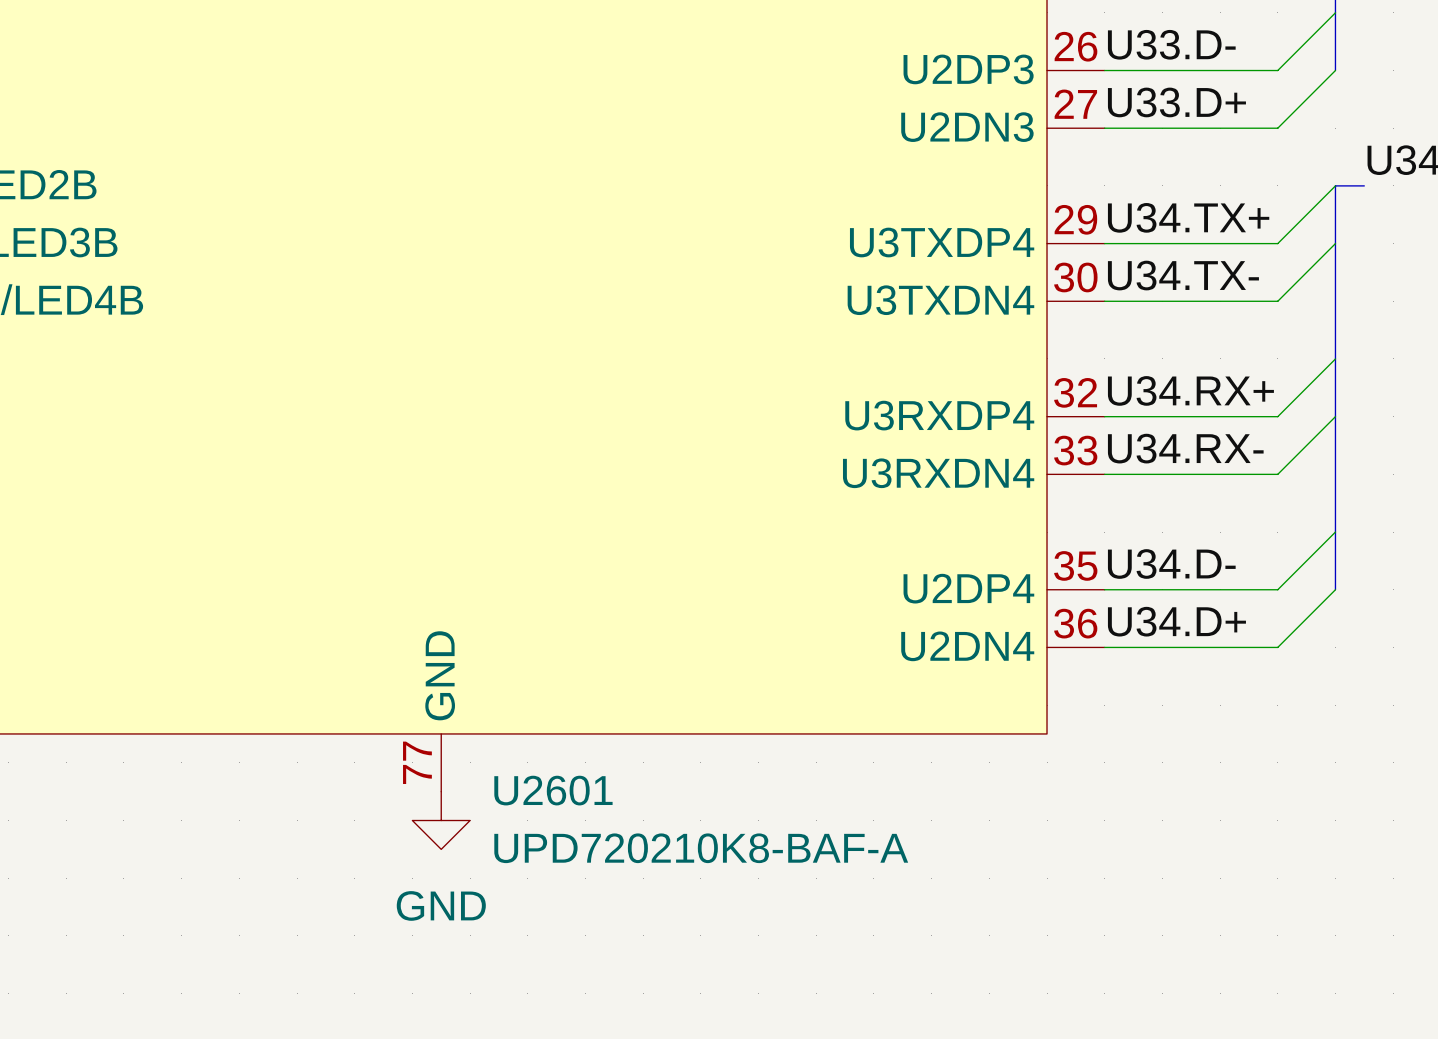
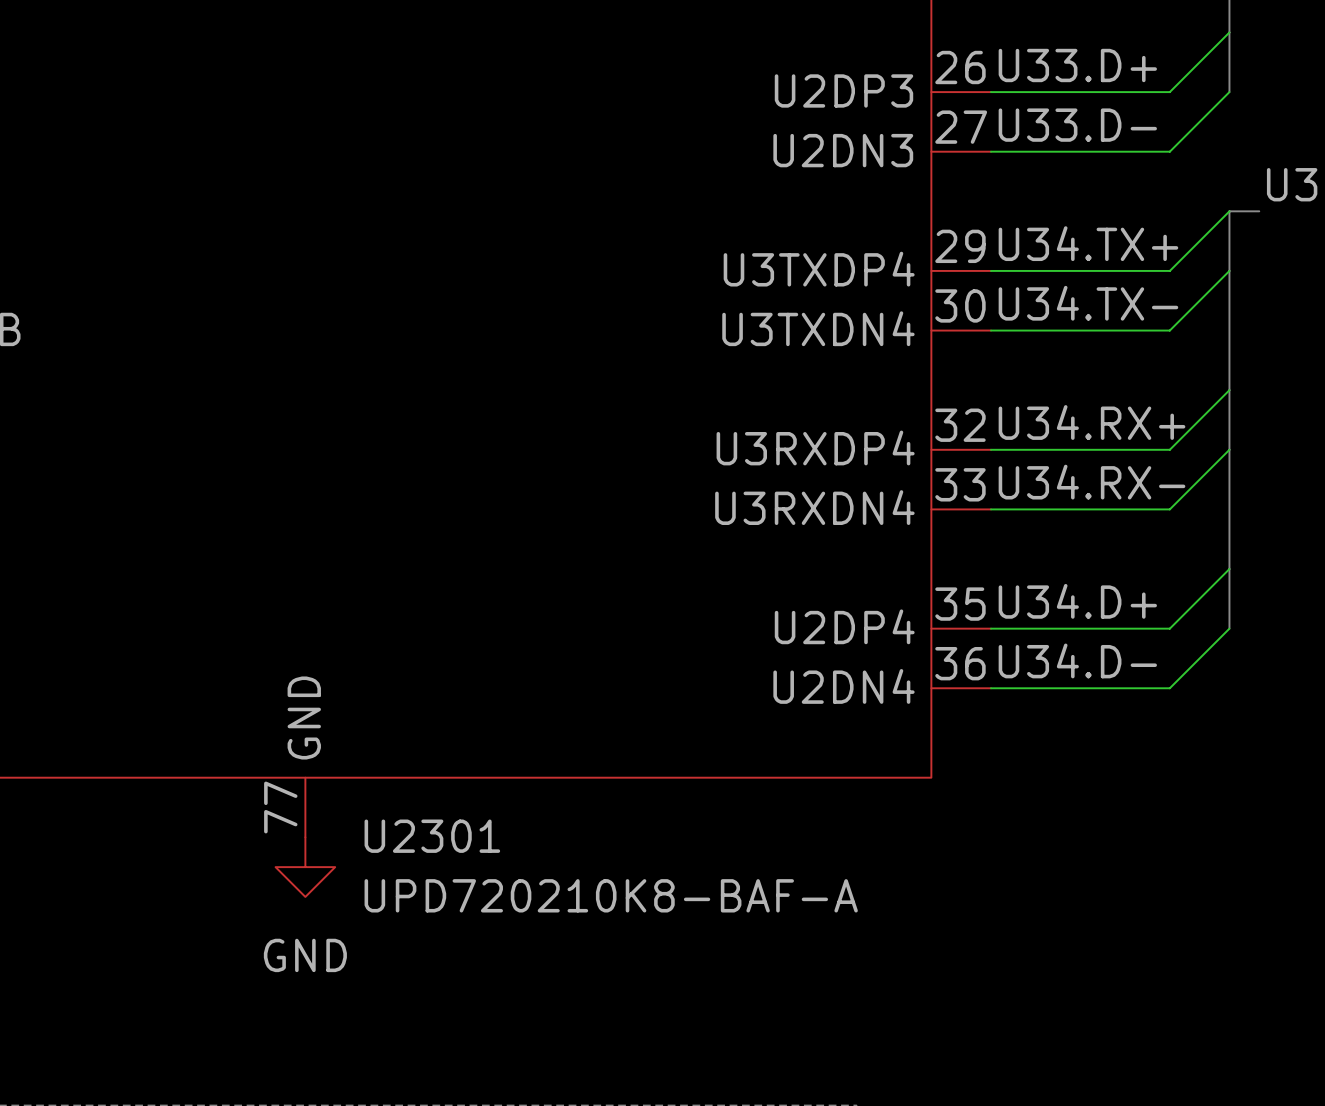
label: U33.D- (1171, 44) -> U33.D+ (1077, 65)
label: U33.D+ (1176, 102) -> U33.D- (1077, 125)
label: U34.D- (1171, 563) -> U34.D+ (1077, 601)
label: U34.D+ (1176, 621) -> U34.D- (1077, 660)
U2601 name: U2601 (553, 790) -> U2301 (432, 836)

